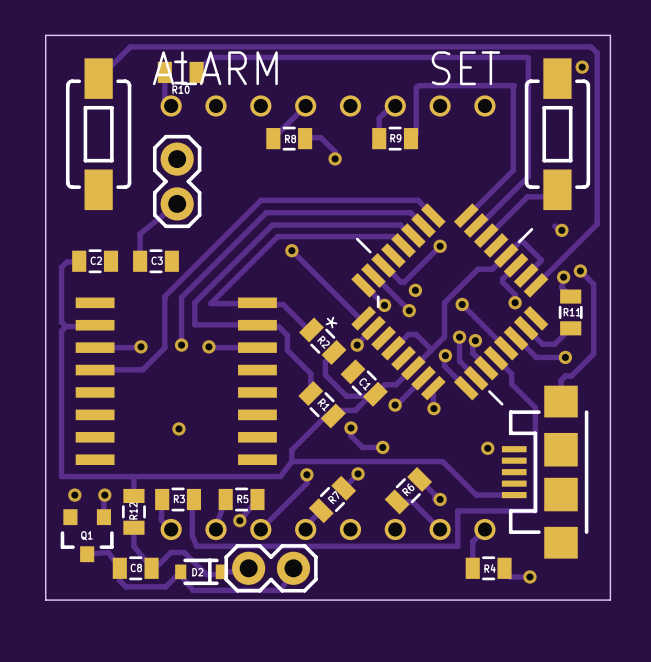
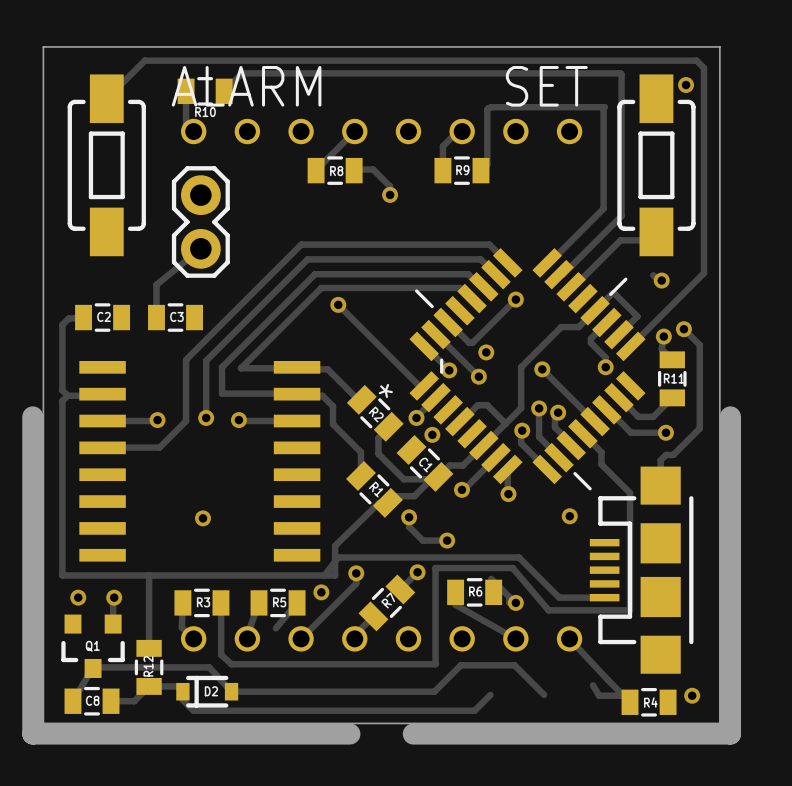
board edge: none -> (32, 416) (32, 734) (349, 734)
board edge: none -> (730, 416) (730, 734) (413, 734)
via: none -> (432, 434)
track: (326, 415) (291, 450) (291, 461) -> (379, 502) (335, 545) (335, 575) (324, 575)
via position: (487, 448) -> (569, 516)
R6 rotation: 0° (408, 490) -> 45° clockwise (474, 592)
track: none -> (149, 598) (149, 636)
track: (193, 499) (192, 501) (192, 535) (196, 546) (457, 546) (457, 510) (535, 510) (535, 505) -> (220, 602) (221, 654) (231, 664) (435, 664) (435, 568) (512, 568) (548, 610) (630, 610)
track: (397, 501) (412, 501) (440, 529) -> (455, 592) (455, 604) (515, 638)
R12 position: (133, 511) -> (149, 667)
via position: (239, 520) -> (321, 592)
track: (484, 529) (472, 541) (472, 568) -> (569, 638) (630, 702)
track: (133, 537) (133, 546) (151, 568) (159, 563) (171, 552) (184, 552) (206, 574) (218, 574) (221, 571) (252, 571) (248, 568) -> none
track: (87, 554) (108, 552) (119, 568) (119, 580) (126, 586) (165, 586) (180, 571) (180, 575) (193, 590) (281, 590) (293, 568) -> none
C8 position: (135, 568) -> (92, 701)
part: (271, 568) -> none
R4 position: (488, 568) -> (649, 702)
D2 rotation: 0° (201, 571) -> 180° (207, 691)
track: none -> (490, 694) (474, 710) (193, 710) (182, 700) (182, 691) (177, 686) (149, 686) (134, 701) (111, 701)
track: none -> (544, 694) (514, 665) (460, 665) (434, 691) (231, 691) (209, 667) (93, 667) (72, 701)
via position: (529, 576) -> (692, 695)

